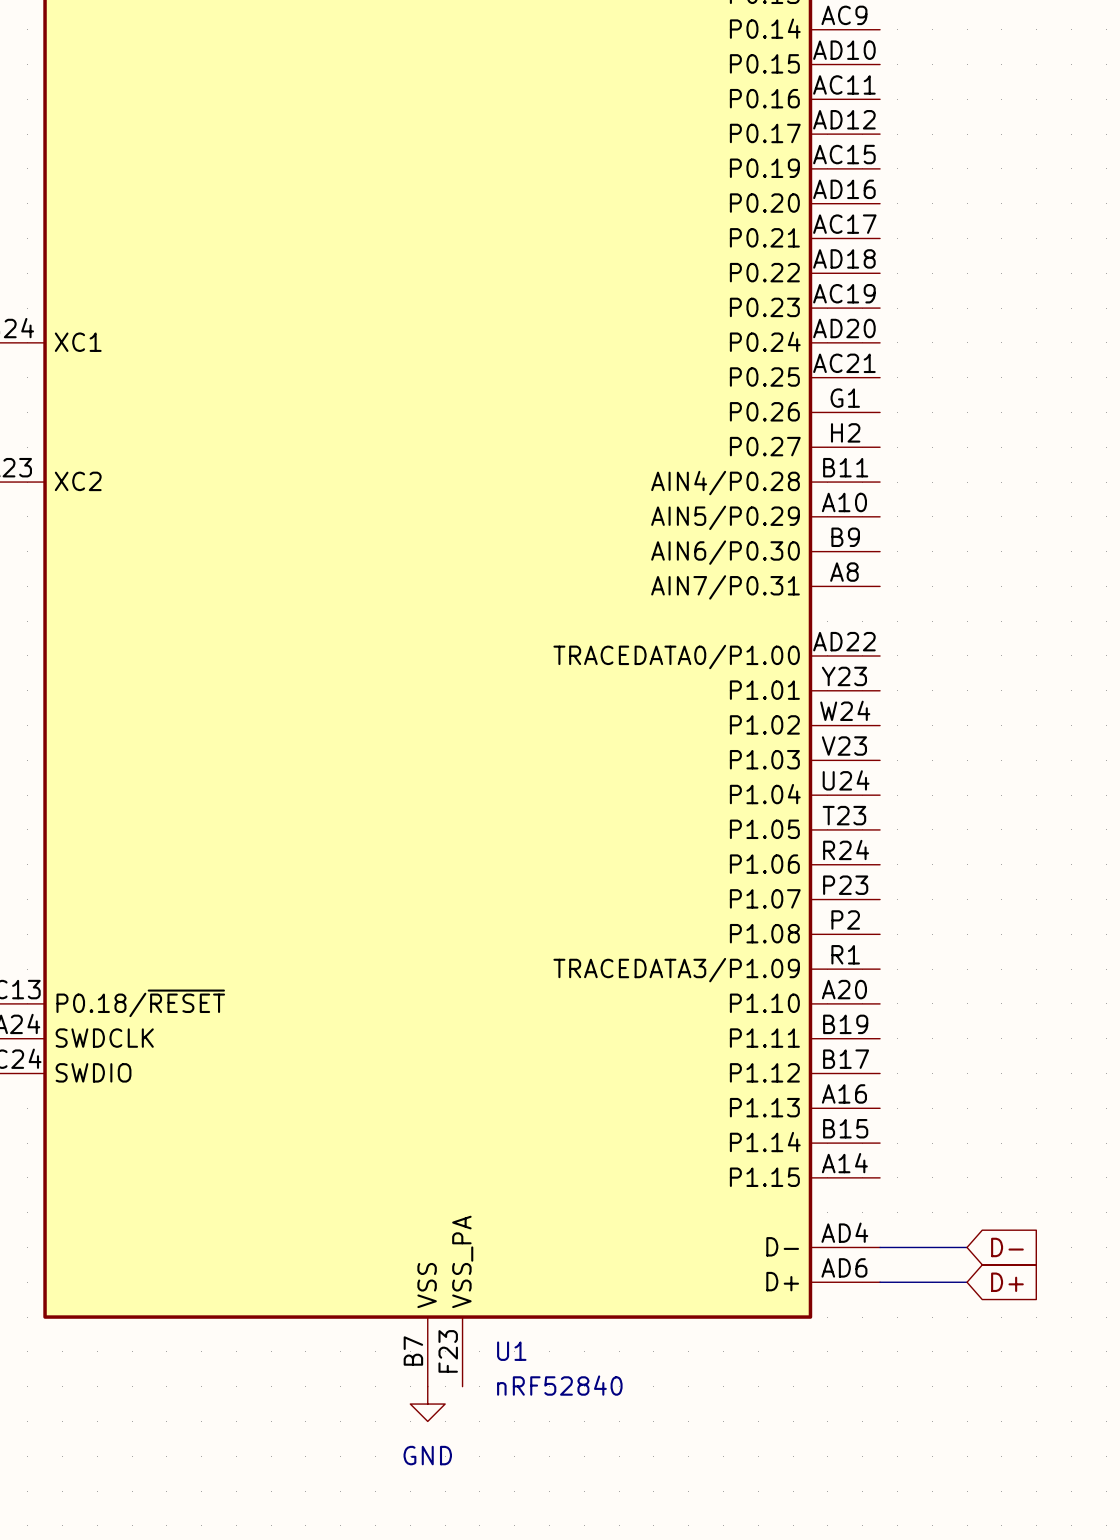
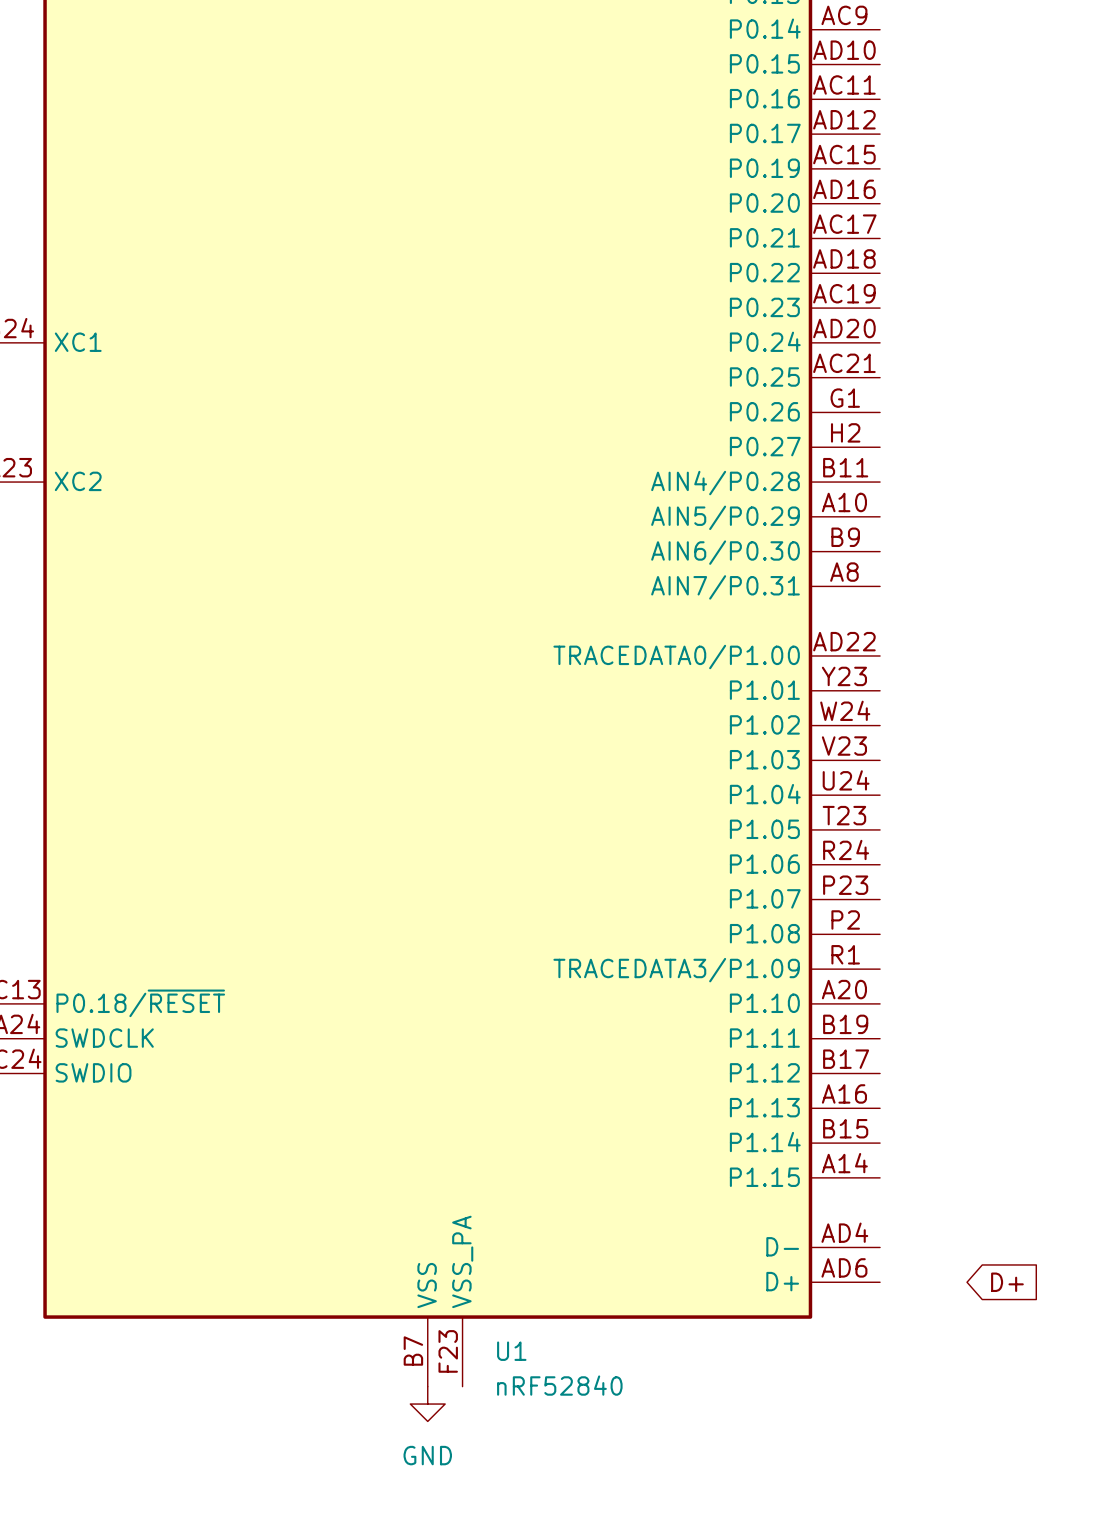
wire: (880, 1247) (967, 1247) -> none
global label: D- (1007, 1247) -> none
wire: (880, 1282) (967, 1282) -> none

